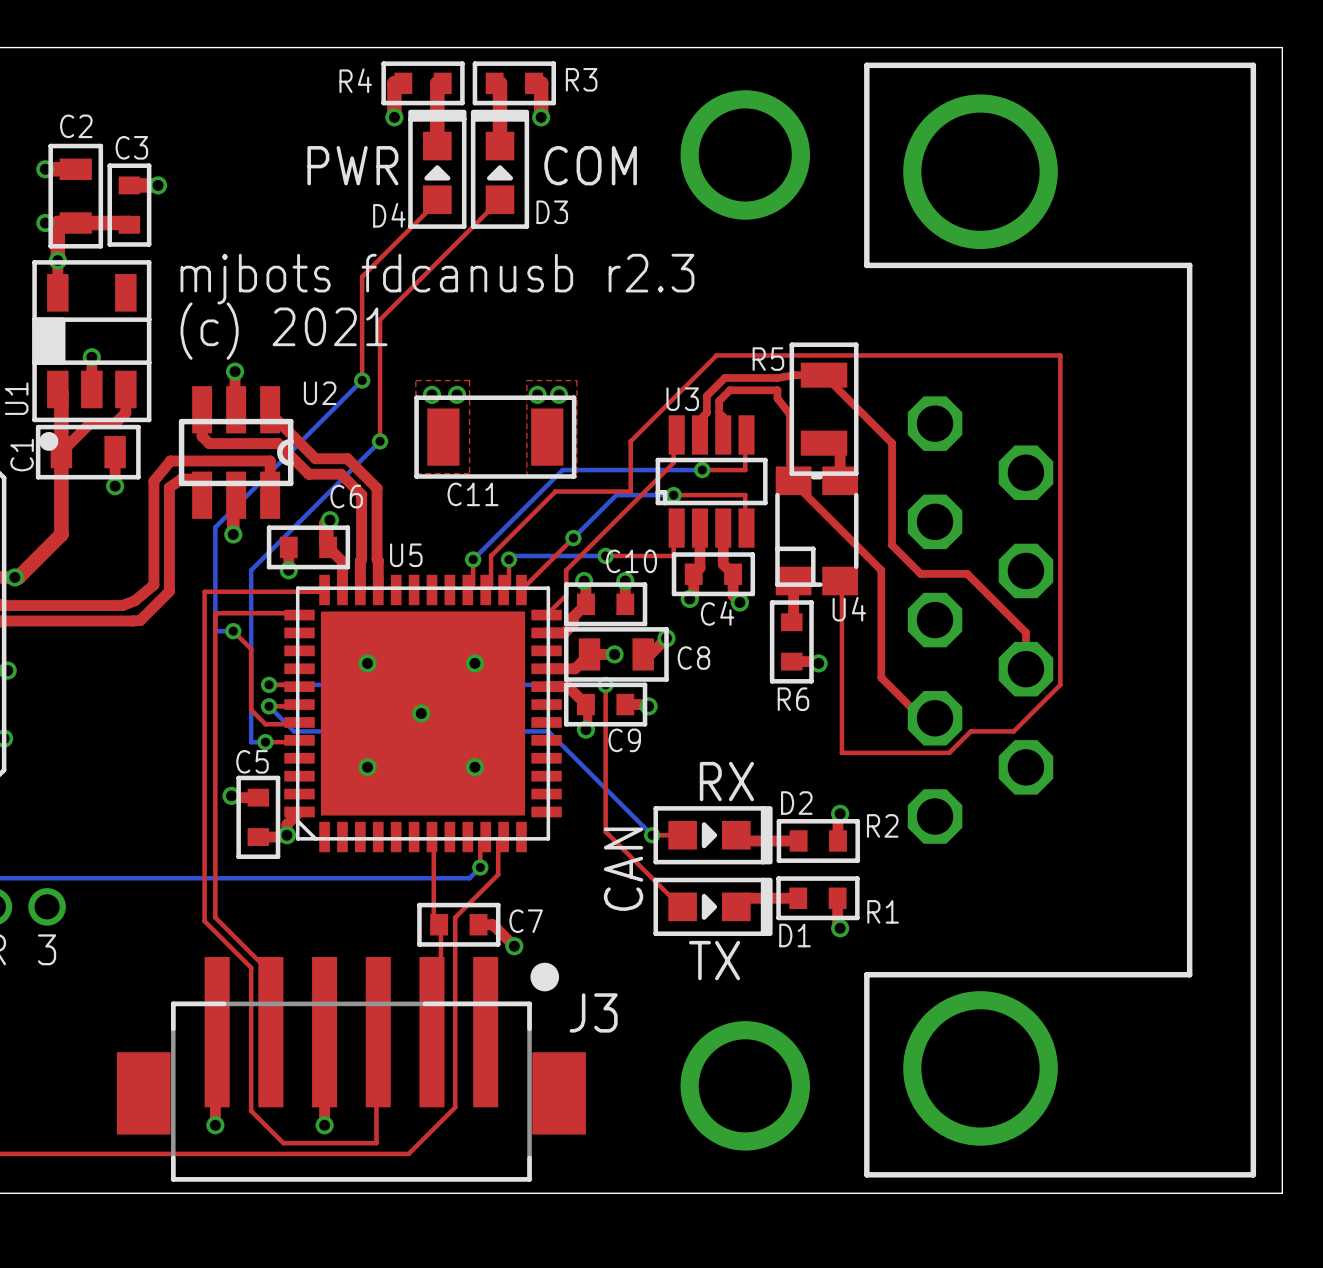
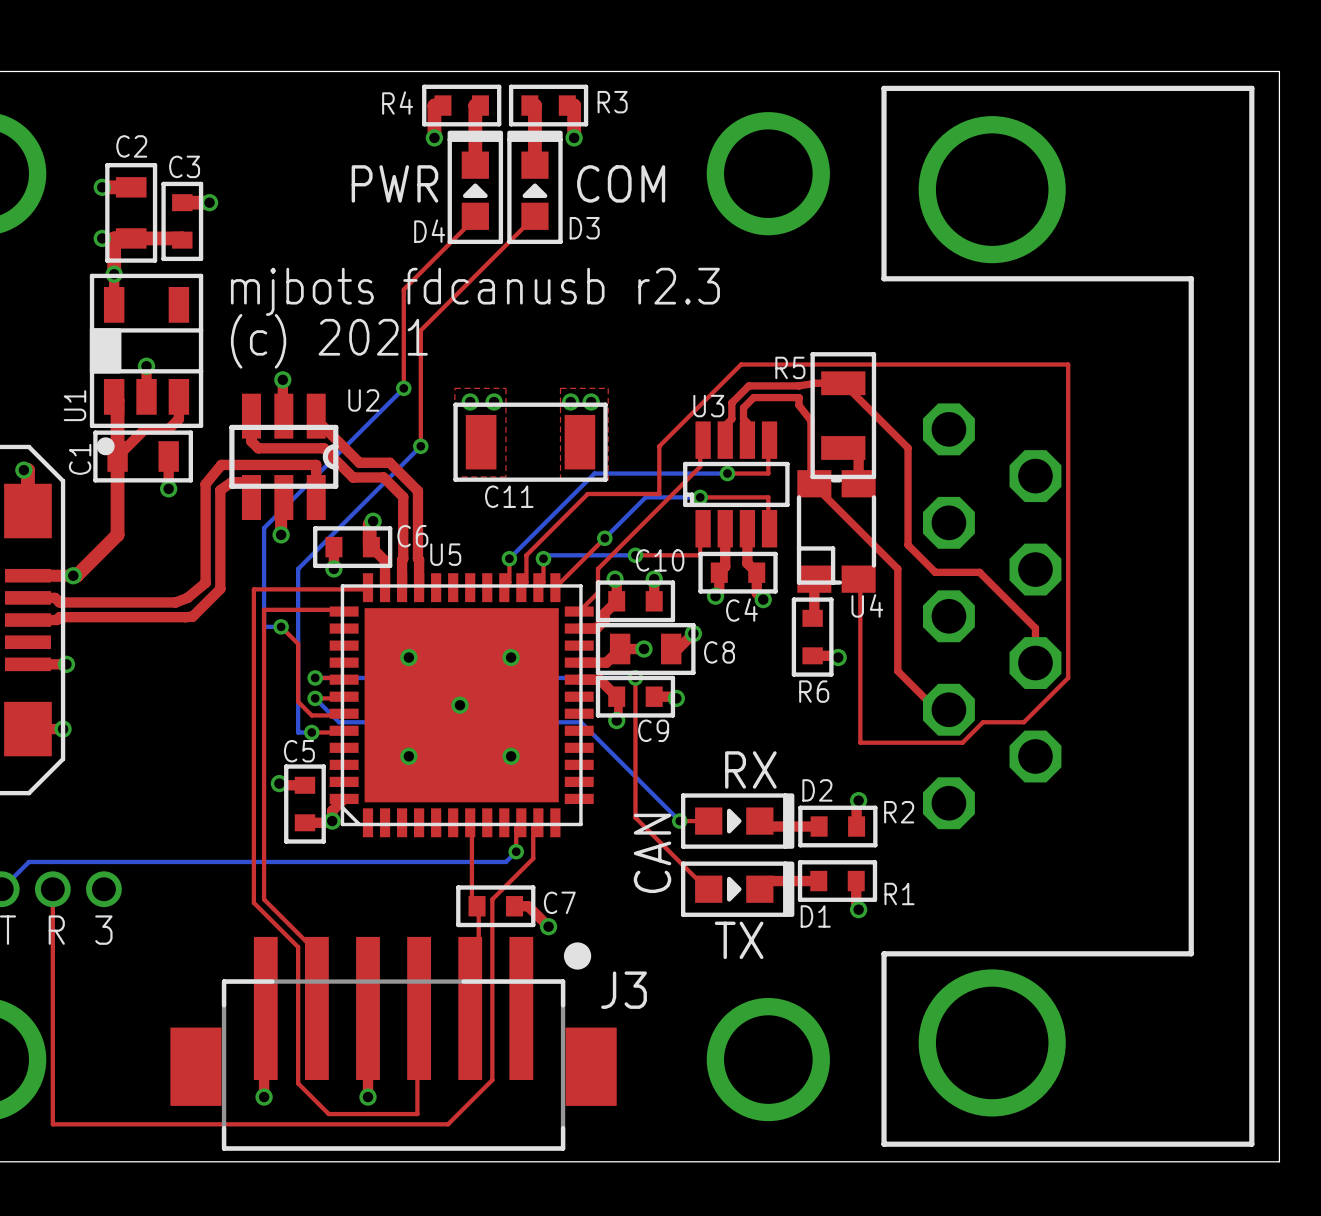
C6 name position: C6 (346, 496) -> C6 (412, 536)

